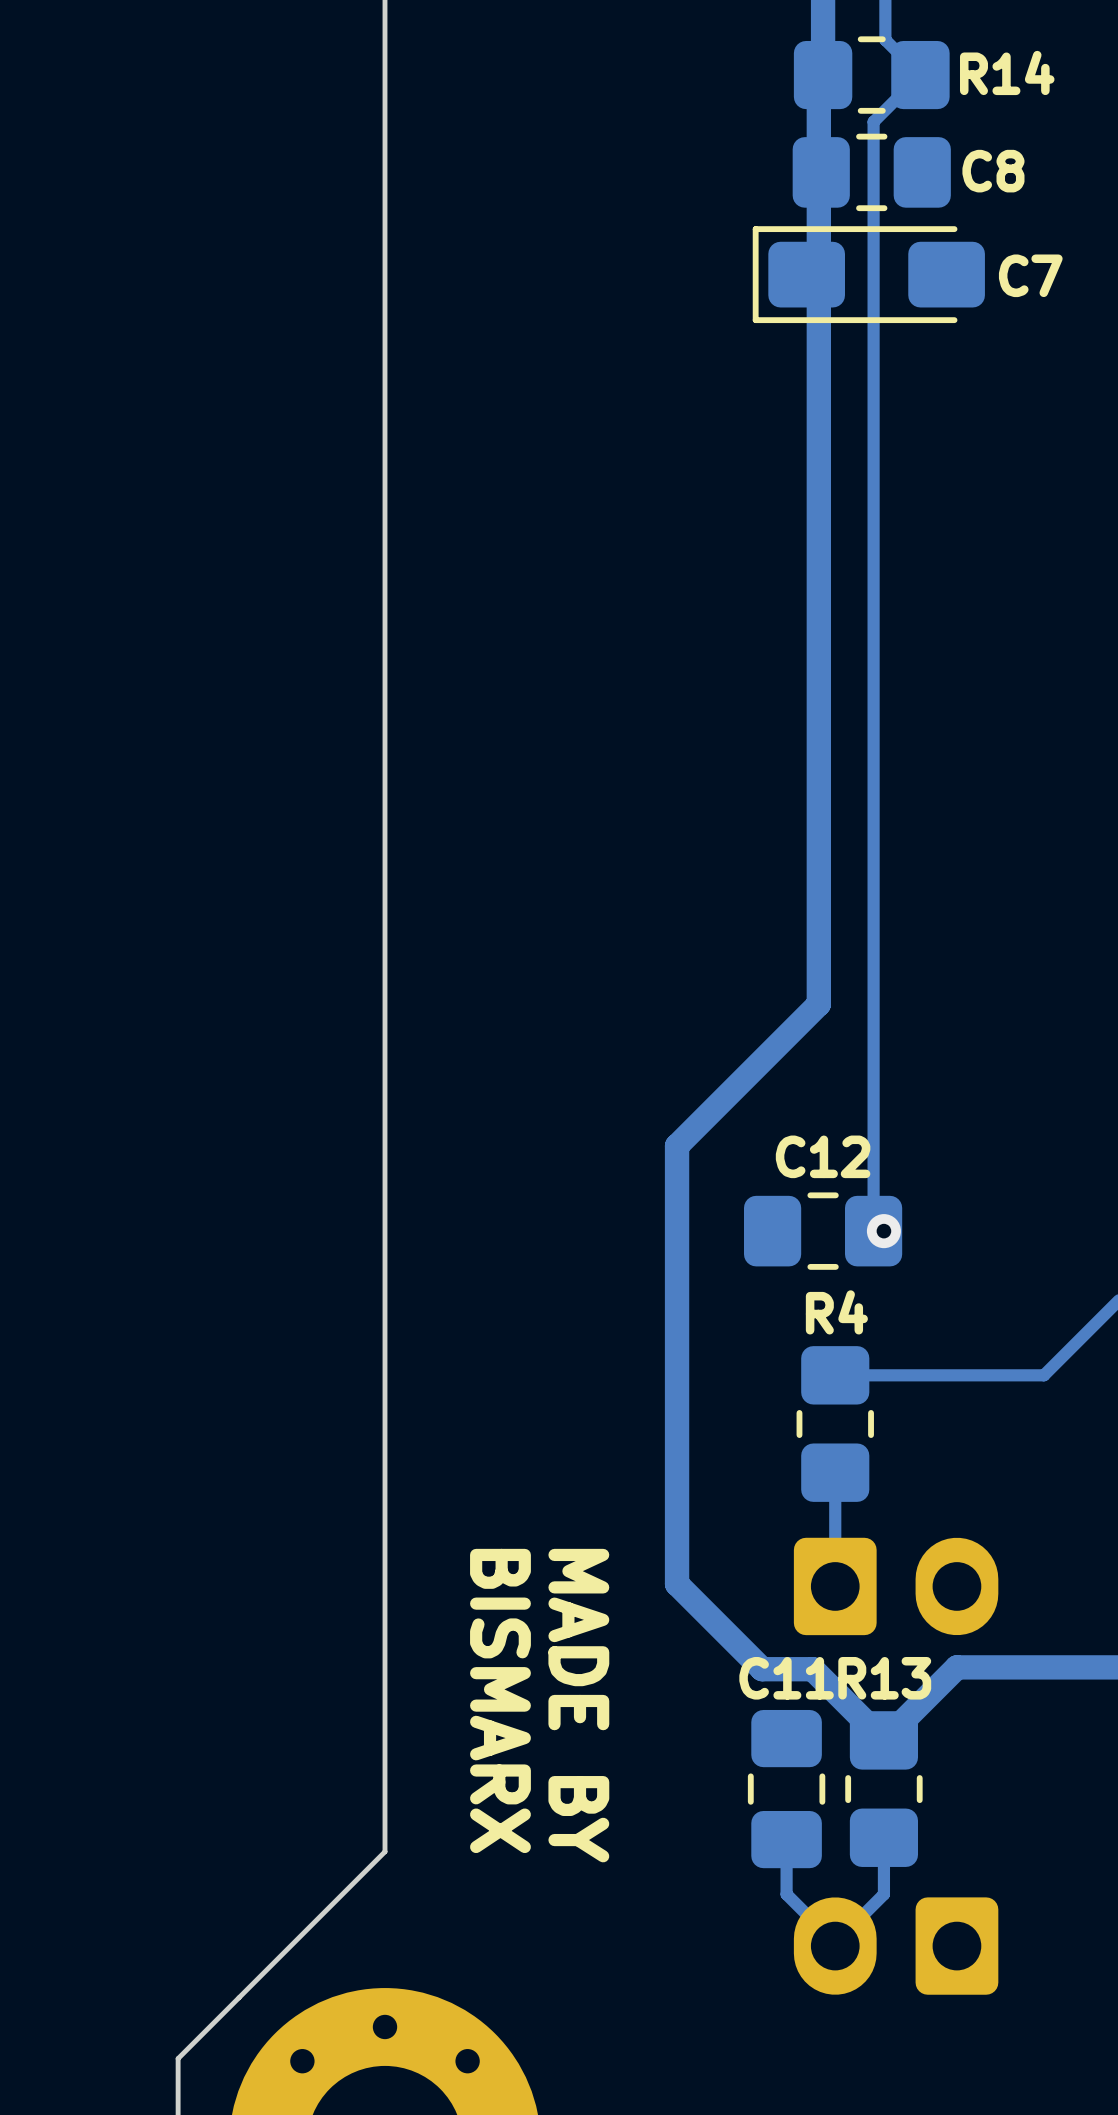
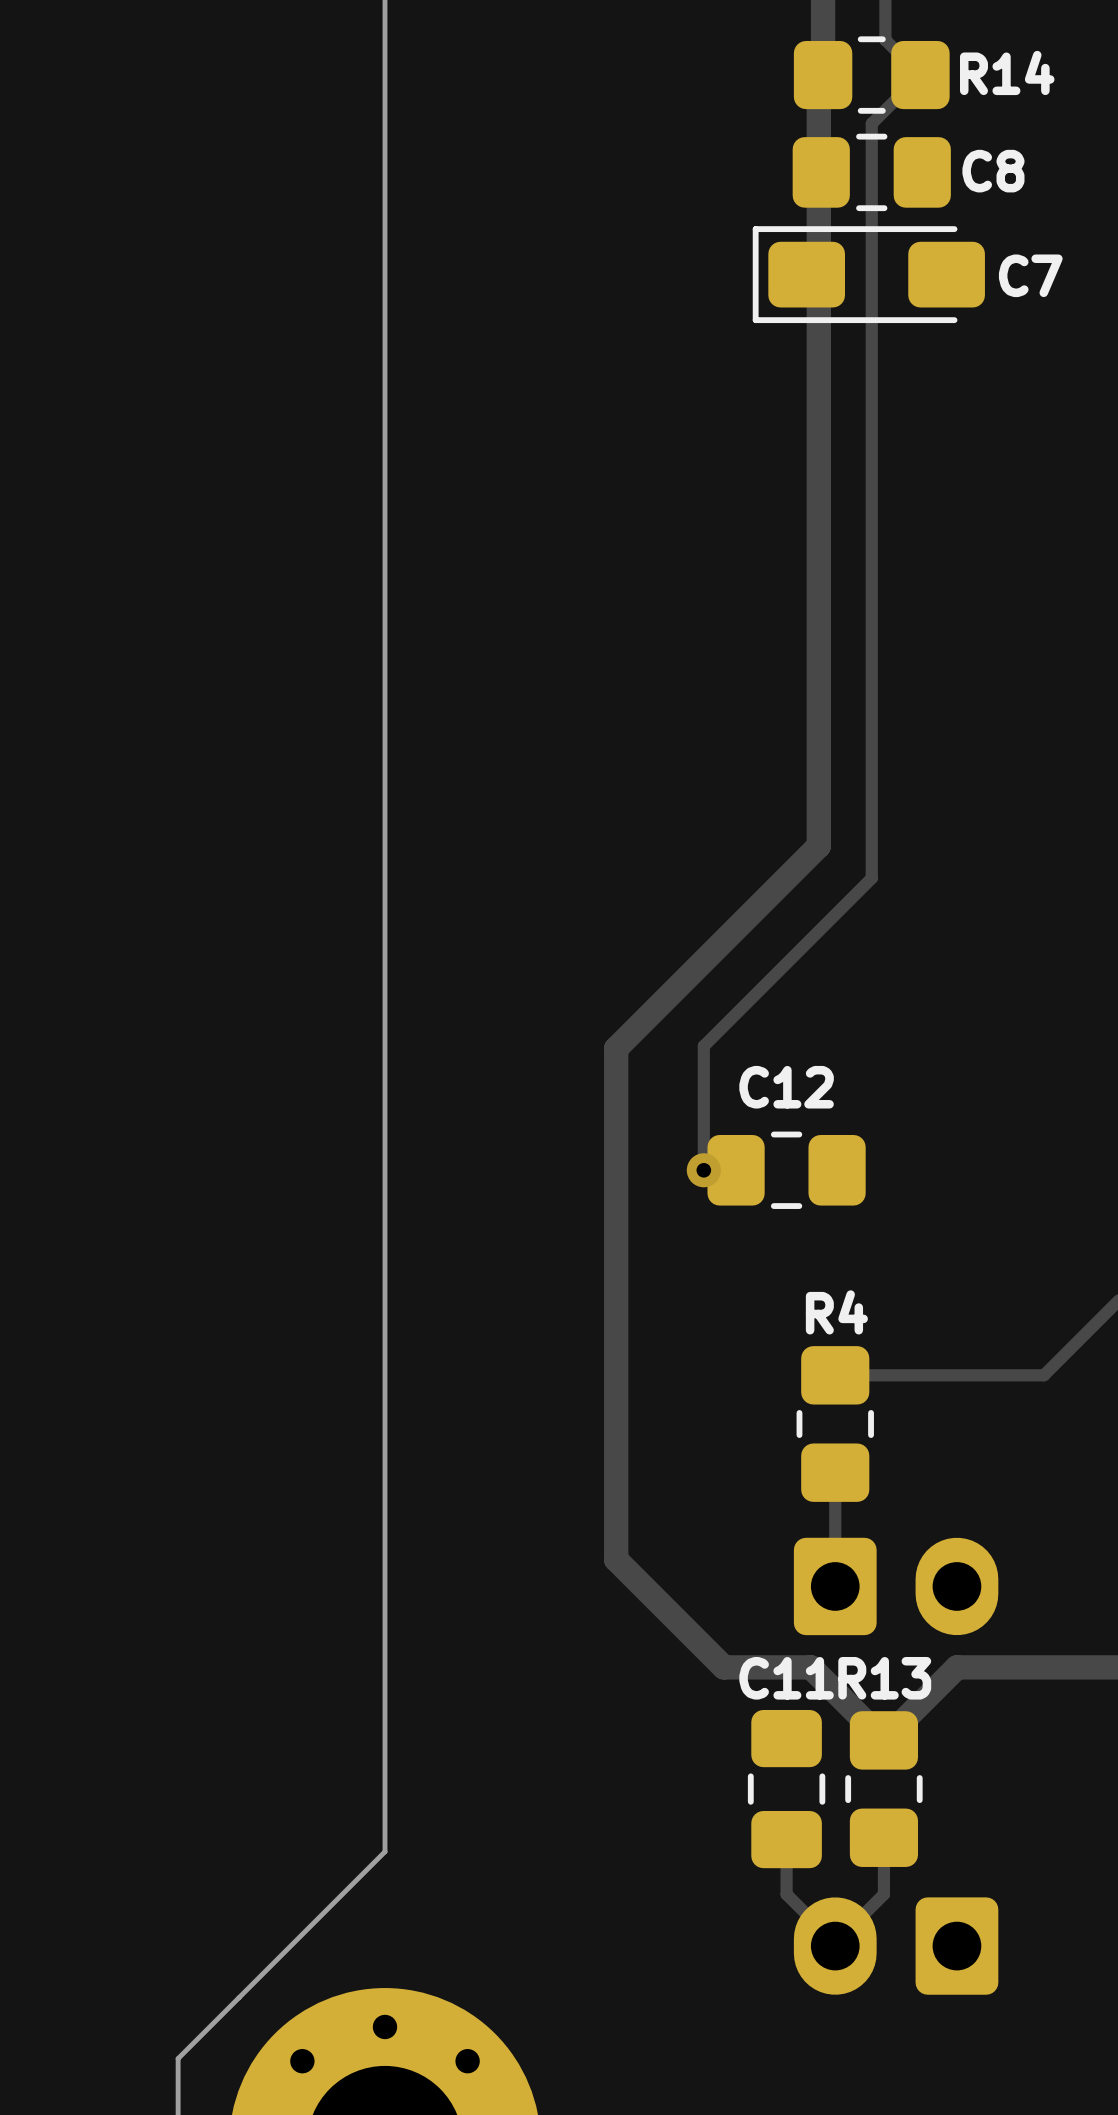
track: (873, 121) (873, 1231) -> (873, 121) (871, 123) (871, 878) (703, 1046) (703, 1170)
track: (818, 845) (818, 1004) (677, 1145) (677, 1584) (762, 1669) (812, 1669) -> (818, 845) (616, 1048) (616, 1559) (723, 1667) (810, 1667) (812, 1669)
C12 name position: C12 (823, 1156) -> C12 (786, 1087)
C12 position: (823, 1231) -> (786, 1170)
via position: (883, 1231) -> (703, 1170)
text: BISMARX (500, 1700) -> none
text: MADE BY (578, 1705) -> none

